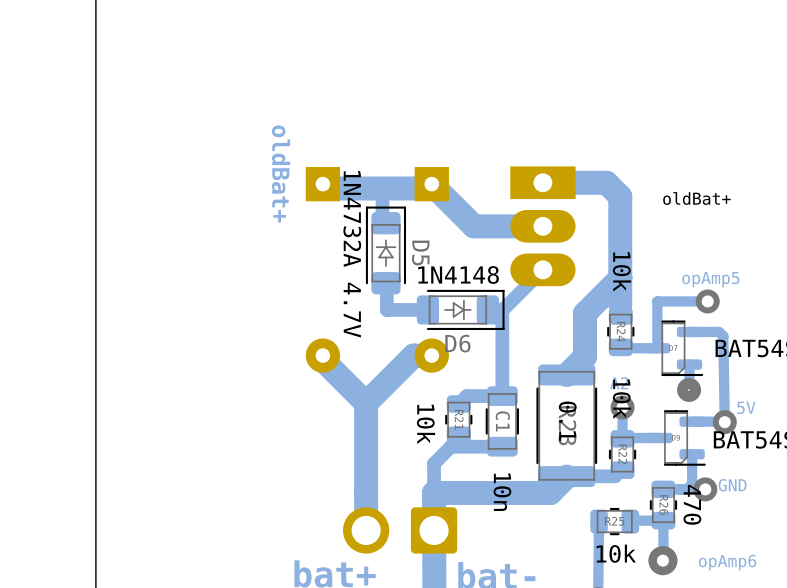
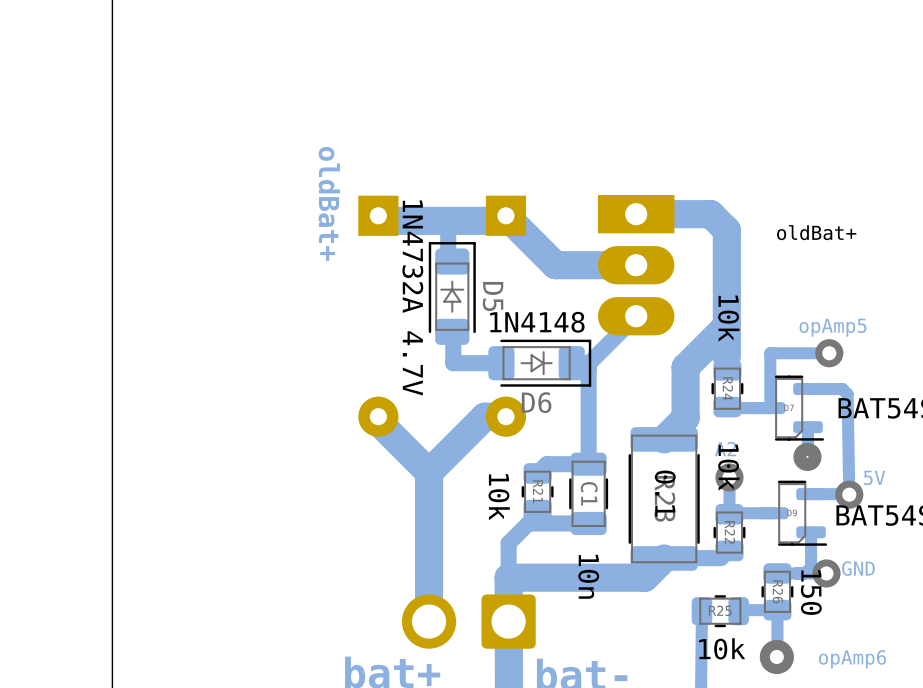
R26 value: 470 (692, 504) -> 150 (811, 592)

